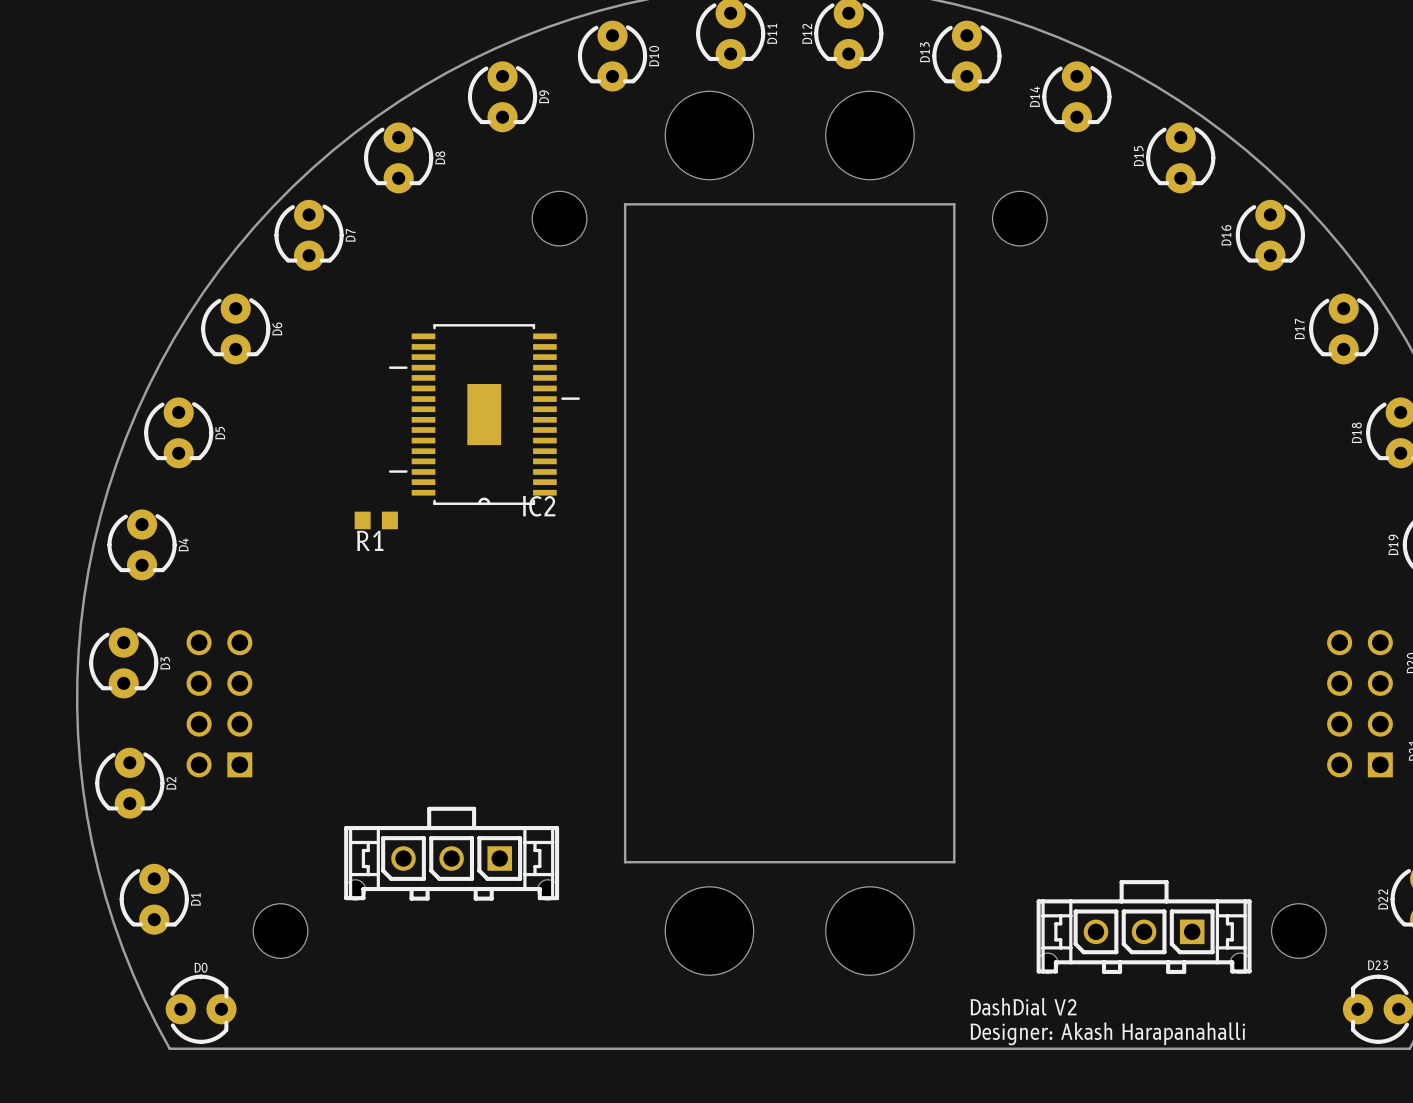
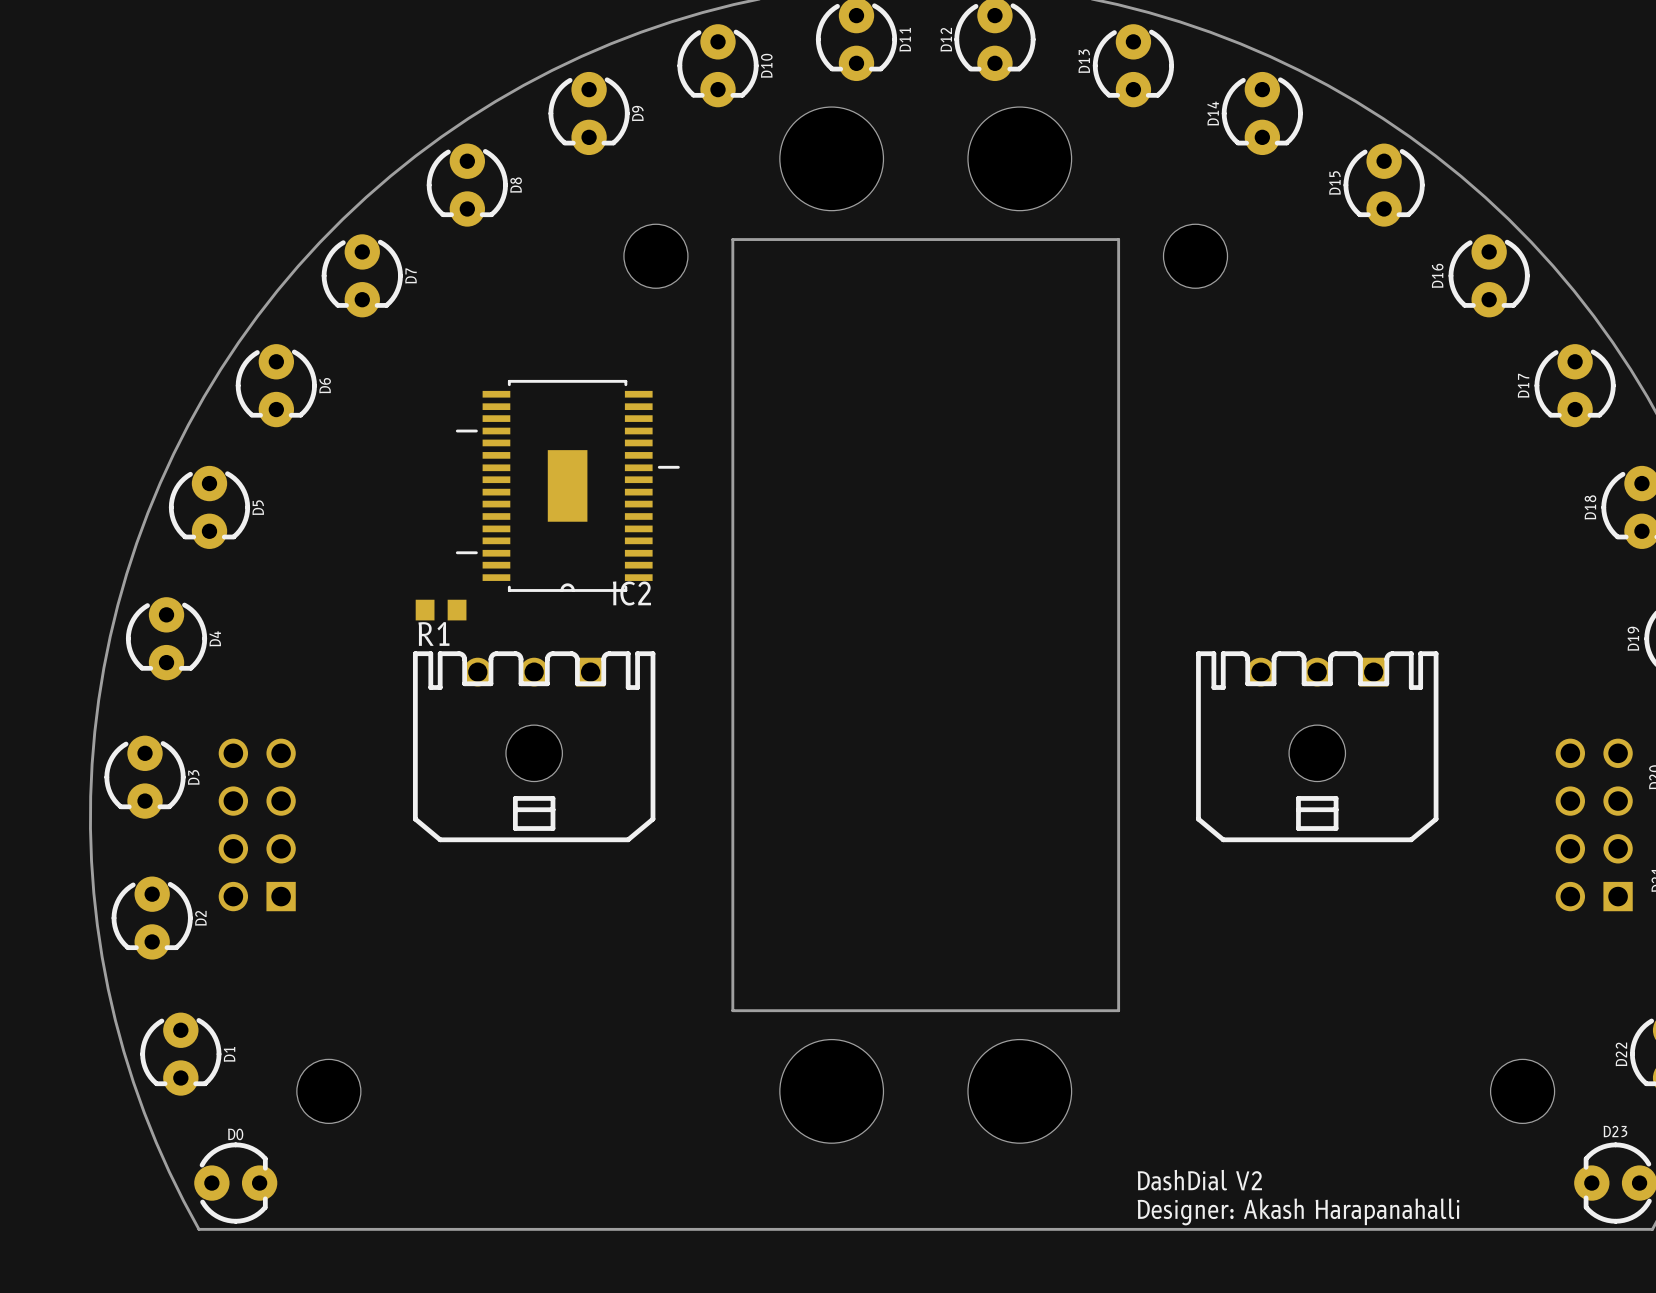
part: none -> (534, 746)
part: none -> (1317, 746)
part: (451, 853) -> none
part: (1144, 927) -> none

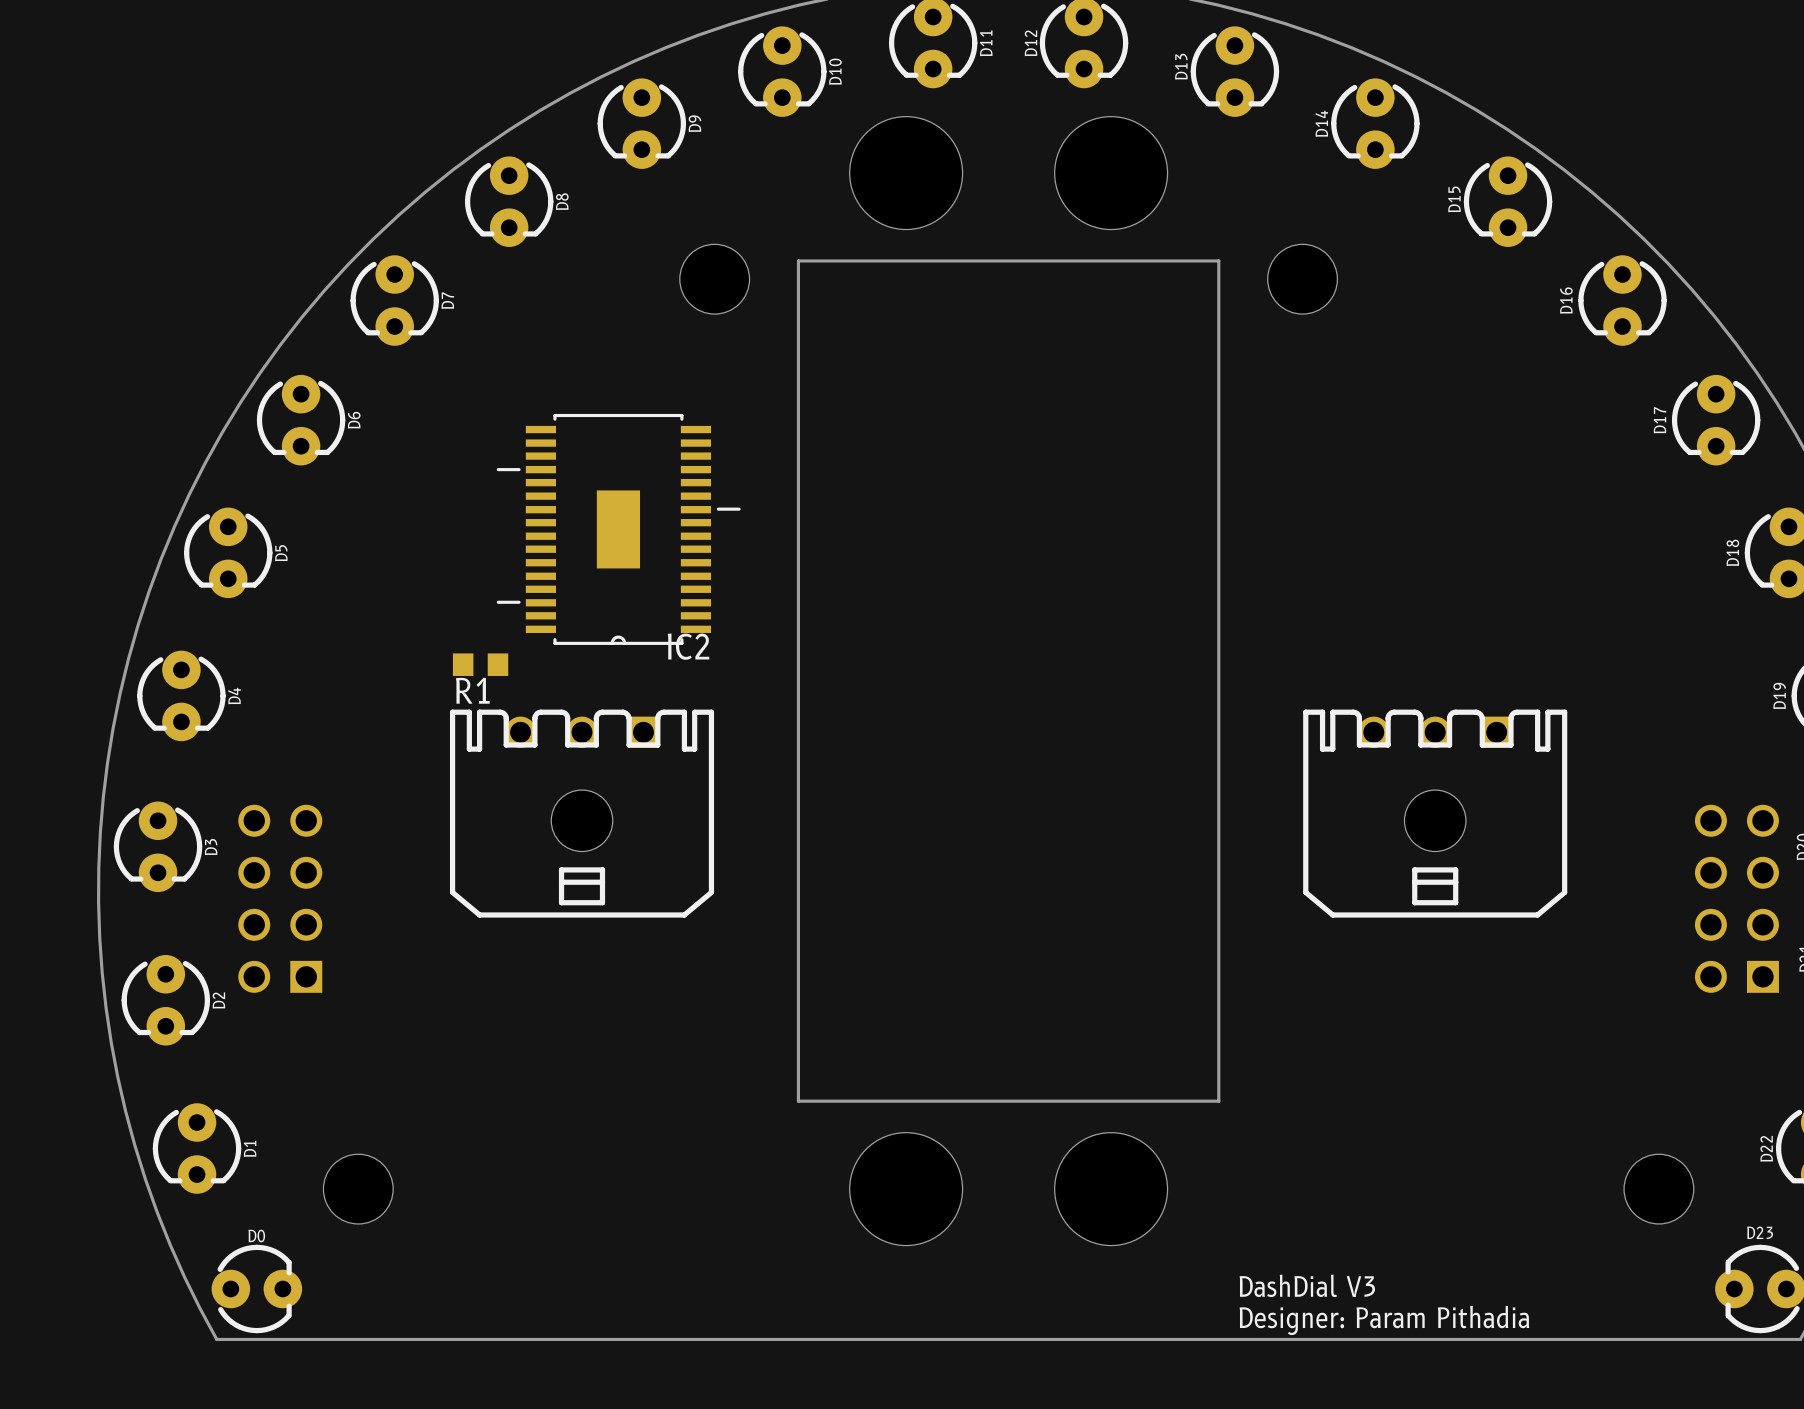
text: DashDial V2 (1199, 1180) -> DashDial V3 (1307, 1285)
text: Designer: Akash Harapanahalli (1298, 1211) -> Designer: Param Pithadia (1384, 1320)

